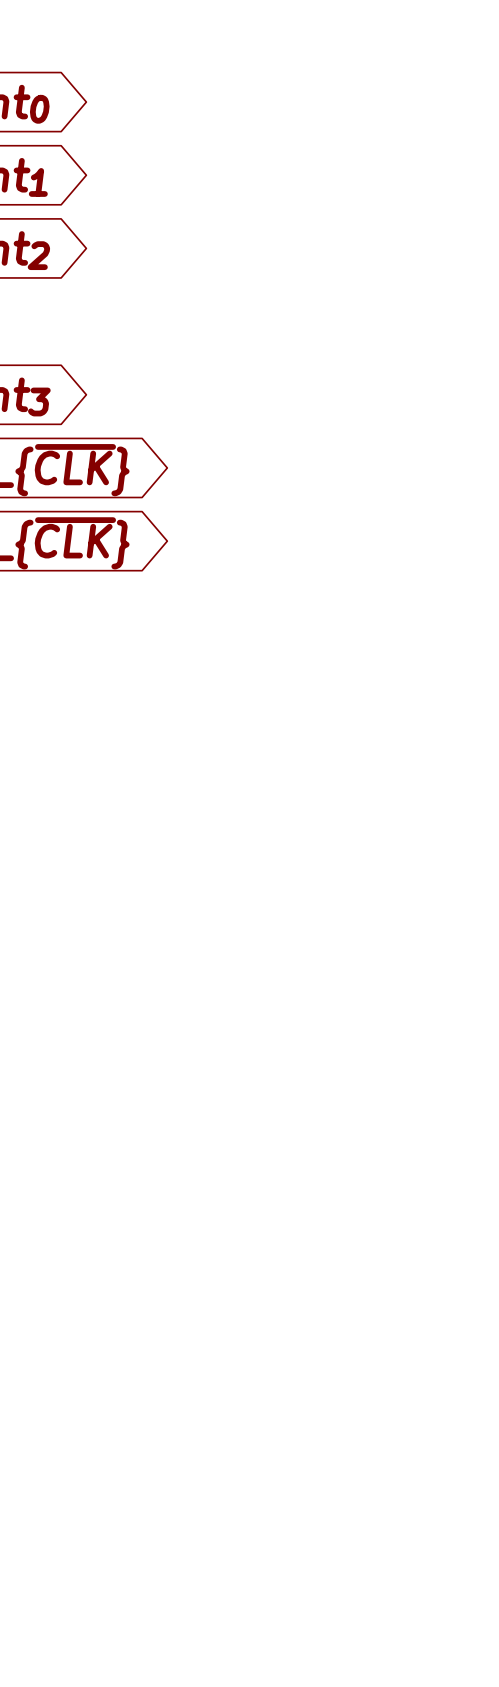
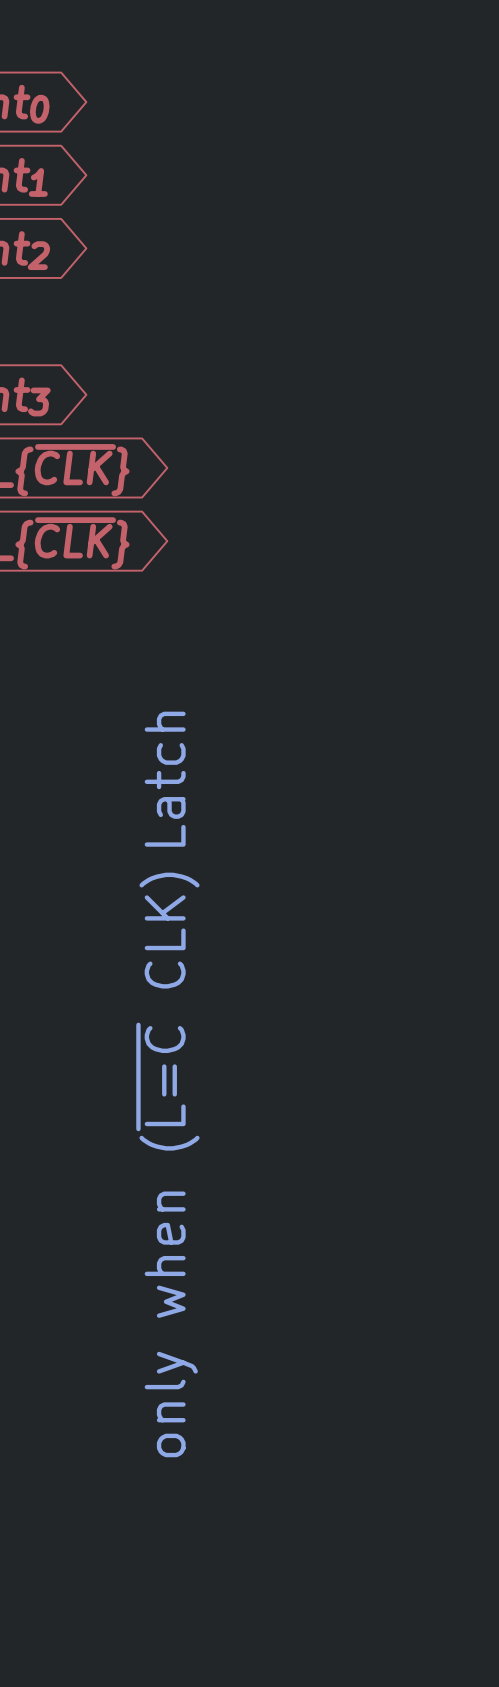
text: none -> Latch (165, 779)
text: none -> only when (~{L=C} CLK) (167, 1164)

